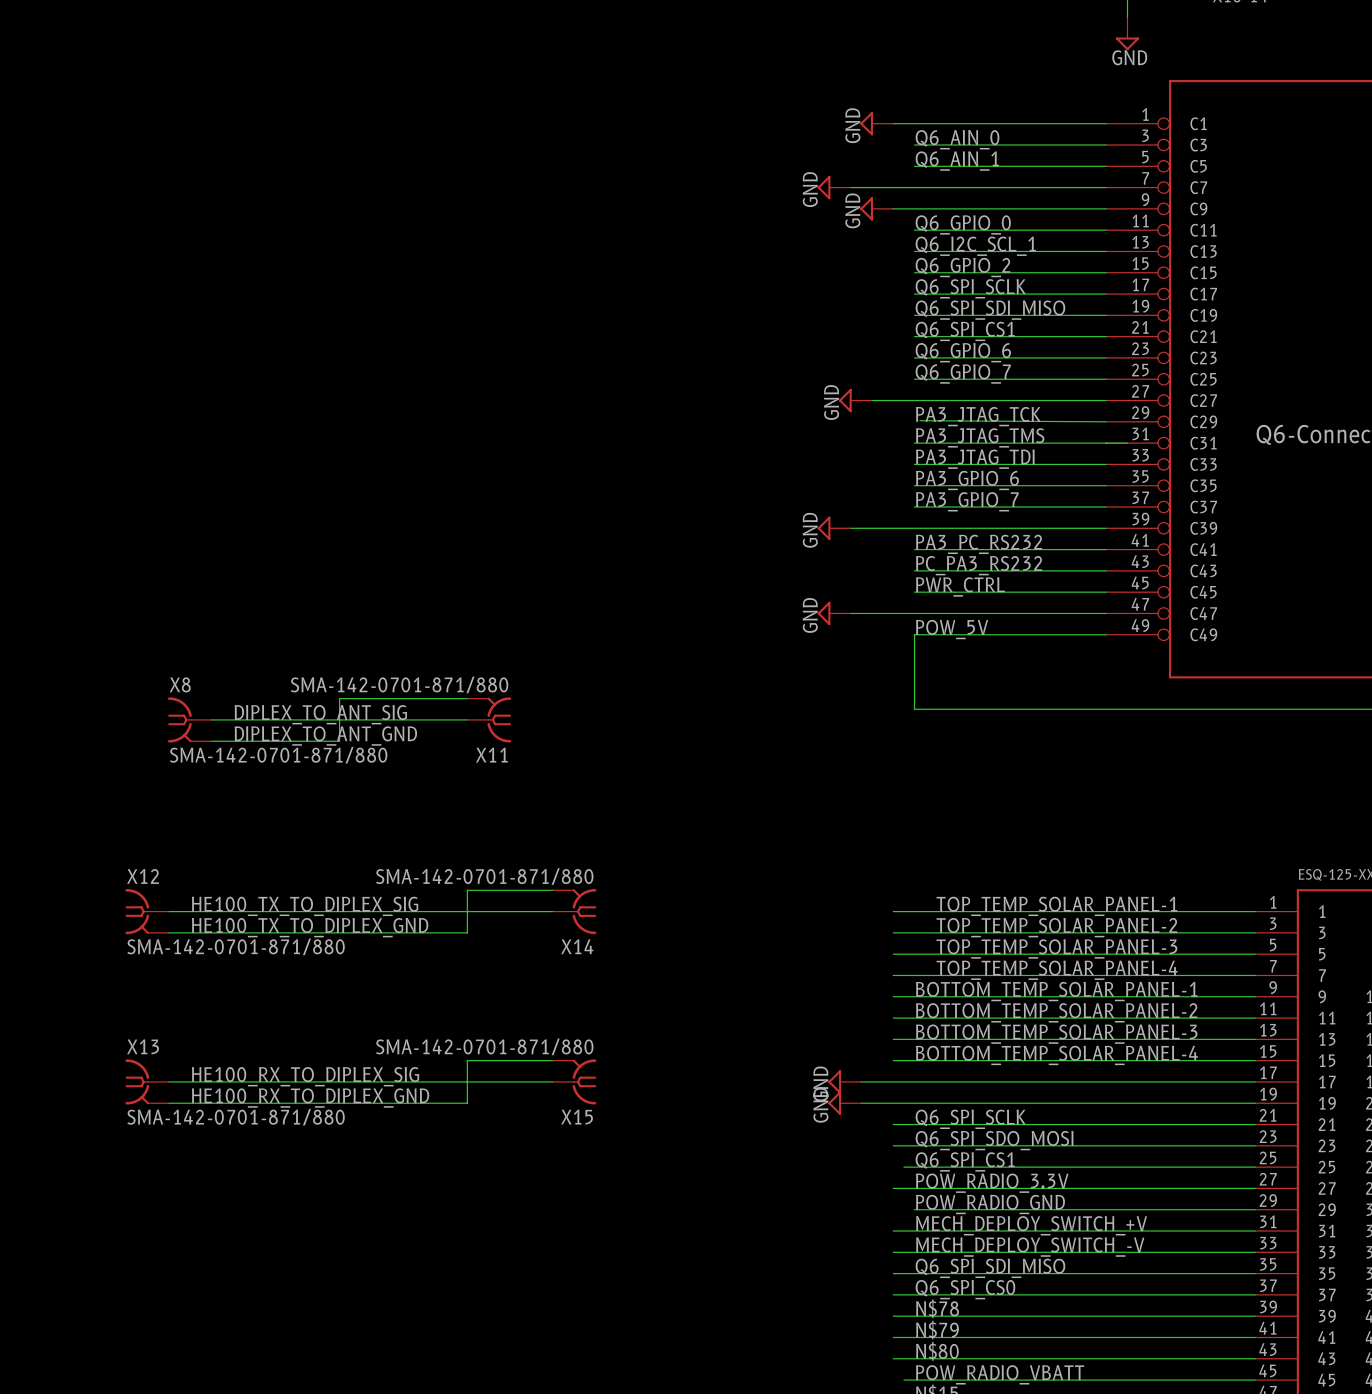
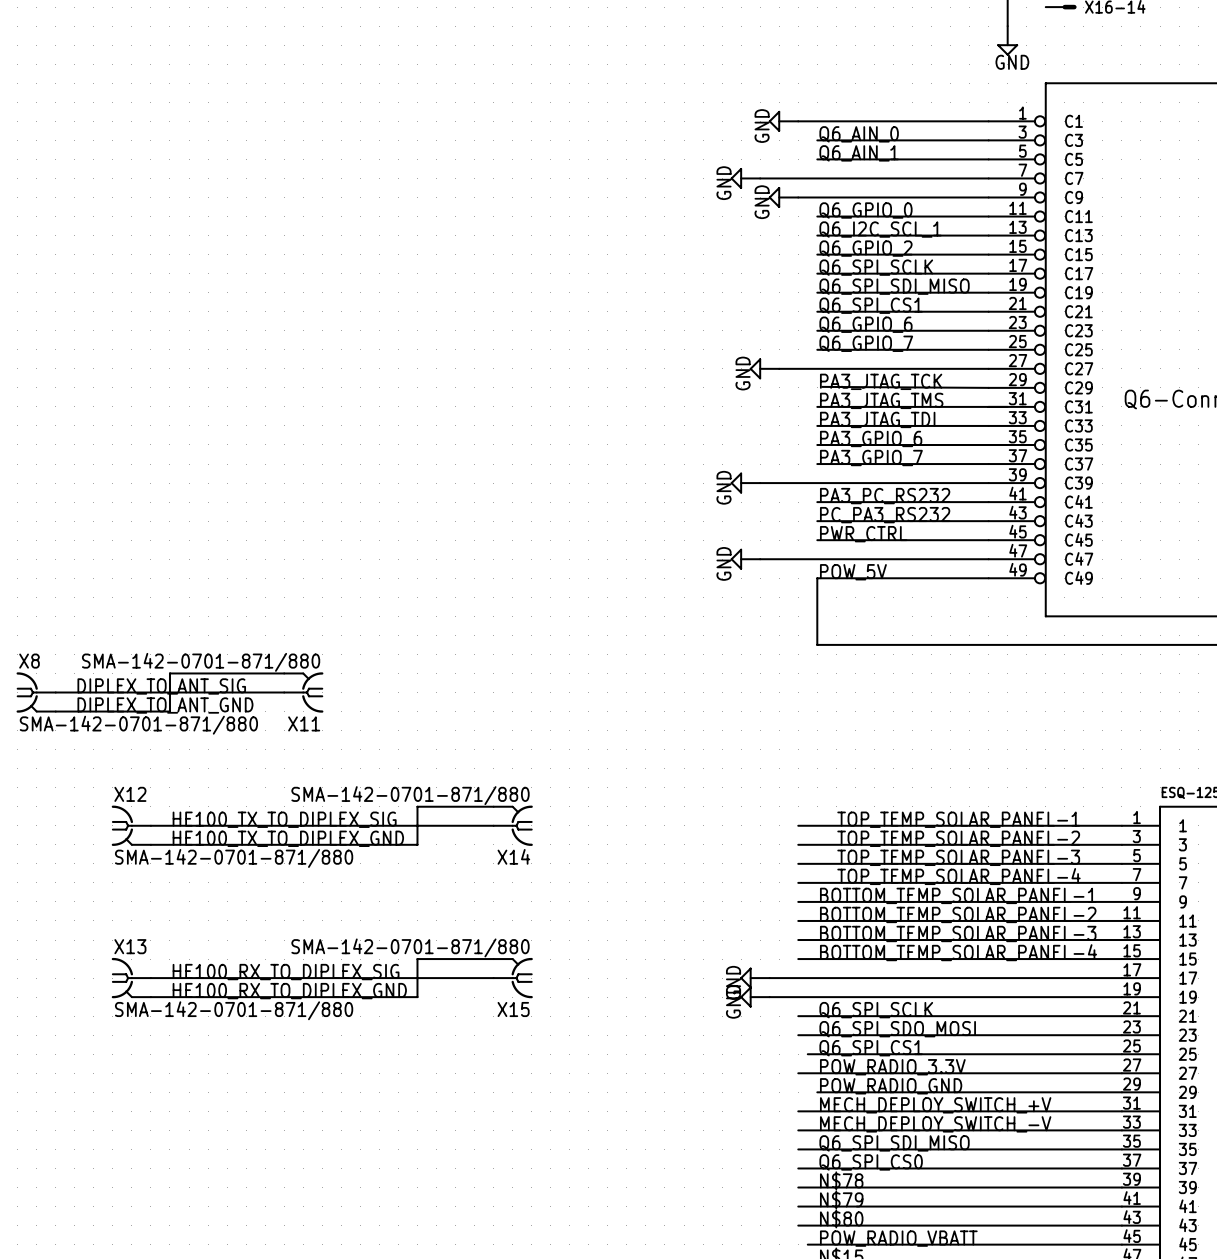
wire: (467, 698) (339, 698) (339, 741) (318, 741) -> none
label position: DIPLEX_TO_ANT_SIG (320, 714) -> DIPLEX_TO_ANT_SIG (161, 686)
X8 position: (189, 719) -> (36, 692)
wire: (211, 719) (467, 719) -> (55, 692) (284, 692)
X11 position: (489, 719) -> (303, 692)
label position: DIPLEX_TO_ANT_GND (325, 736) -> DIPLEX_TO_ANT_GND (165, 705)
wire: none -> (189, 673) (169, 673) (169, 711) (55, 711)

